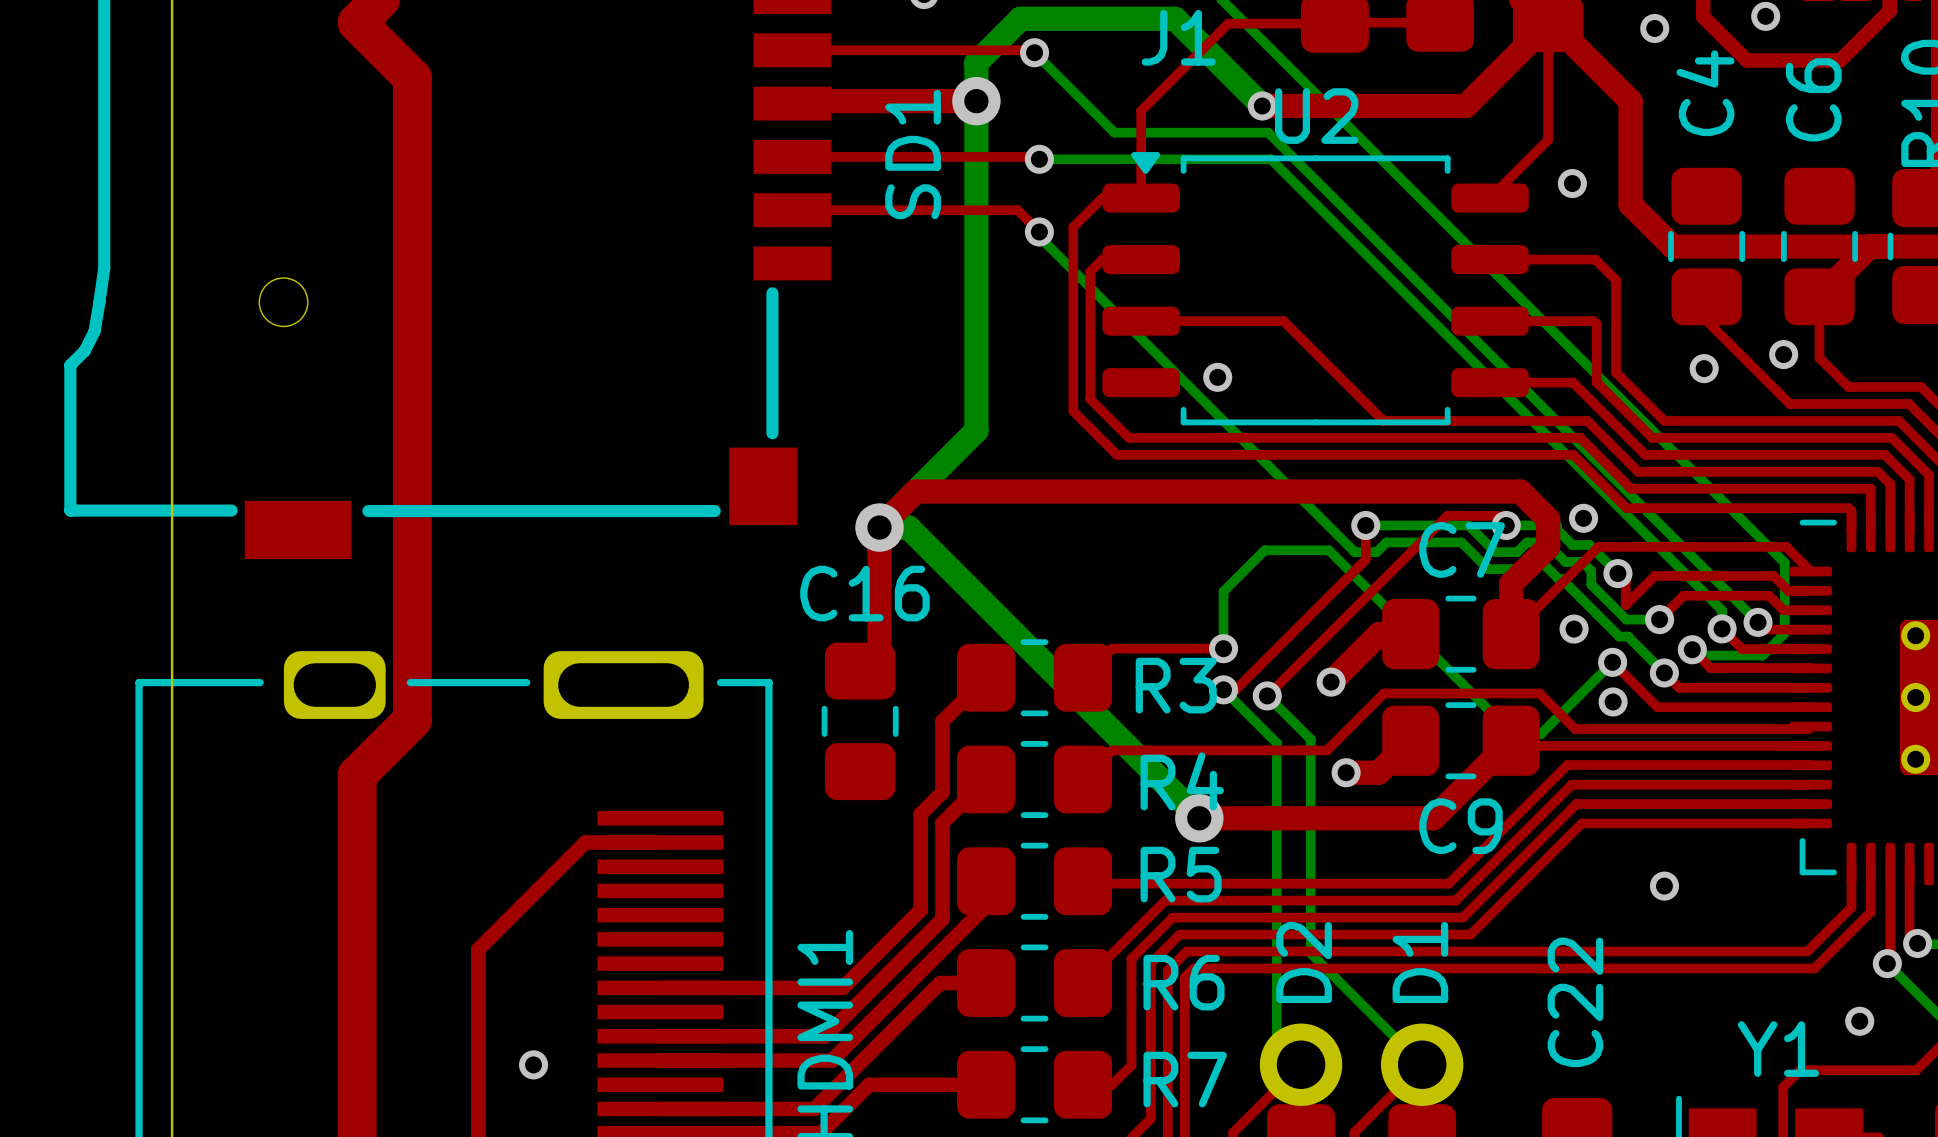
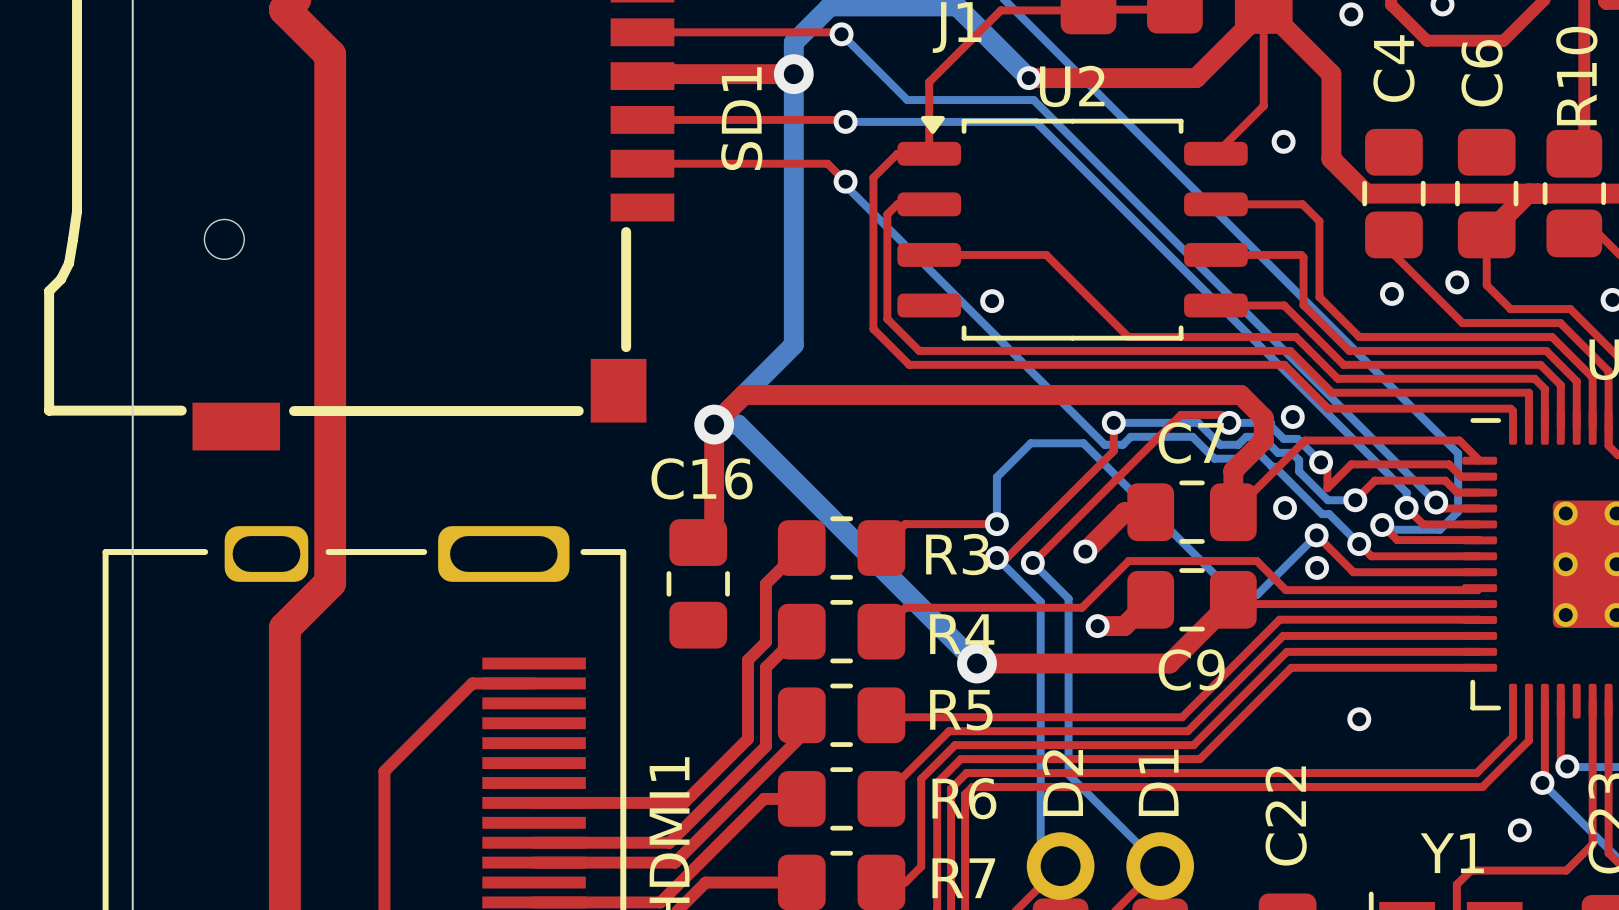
via: (533, 1064) -> none

